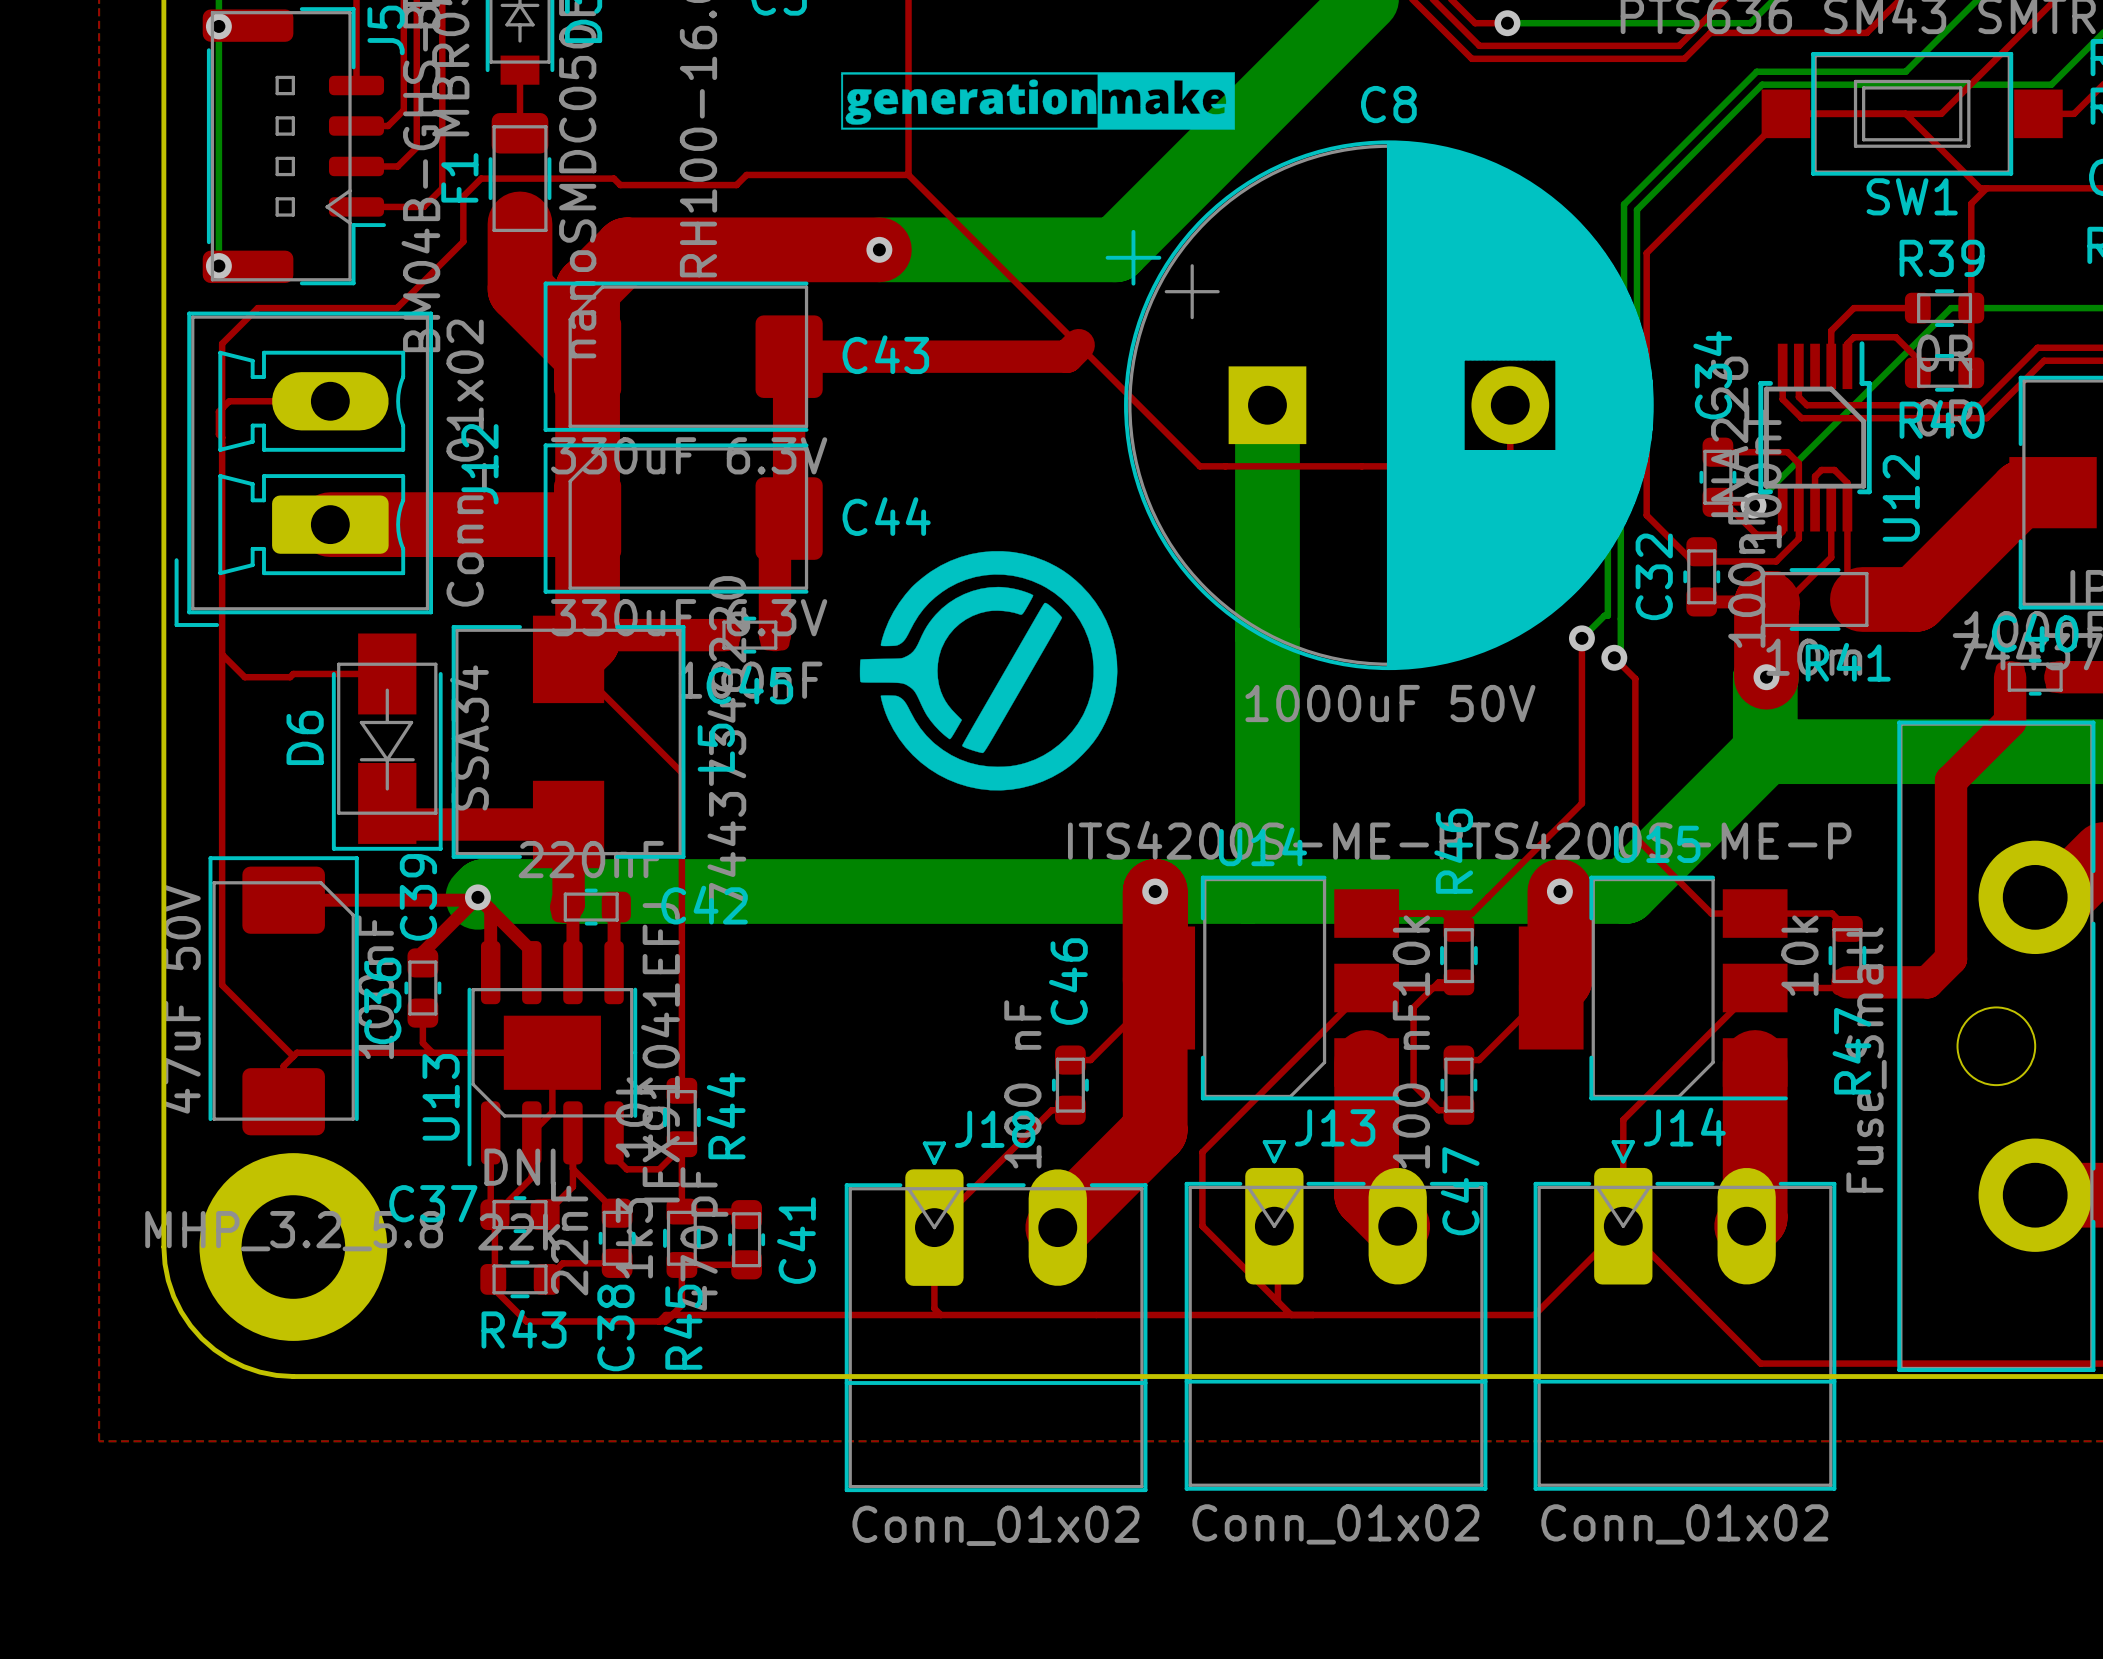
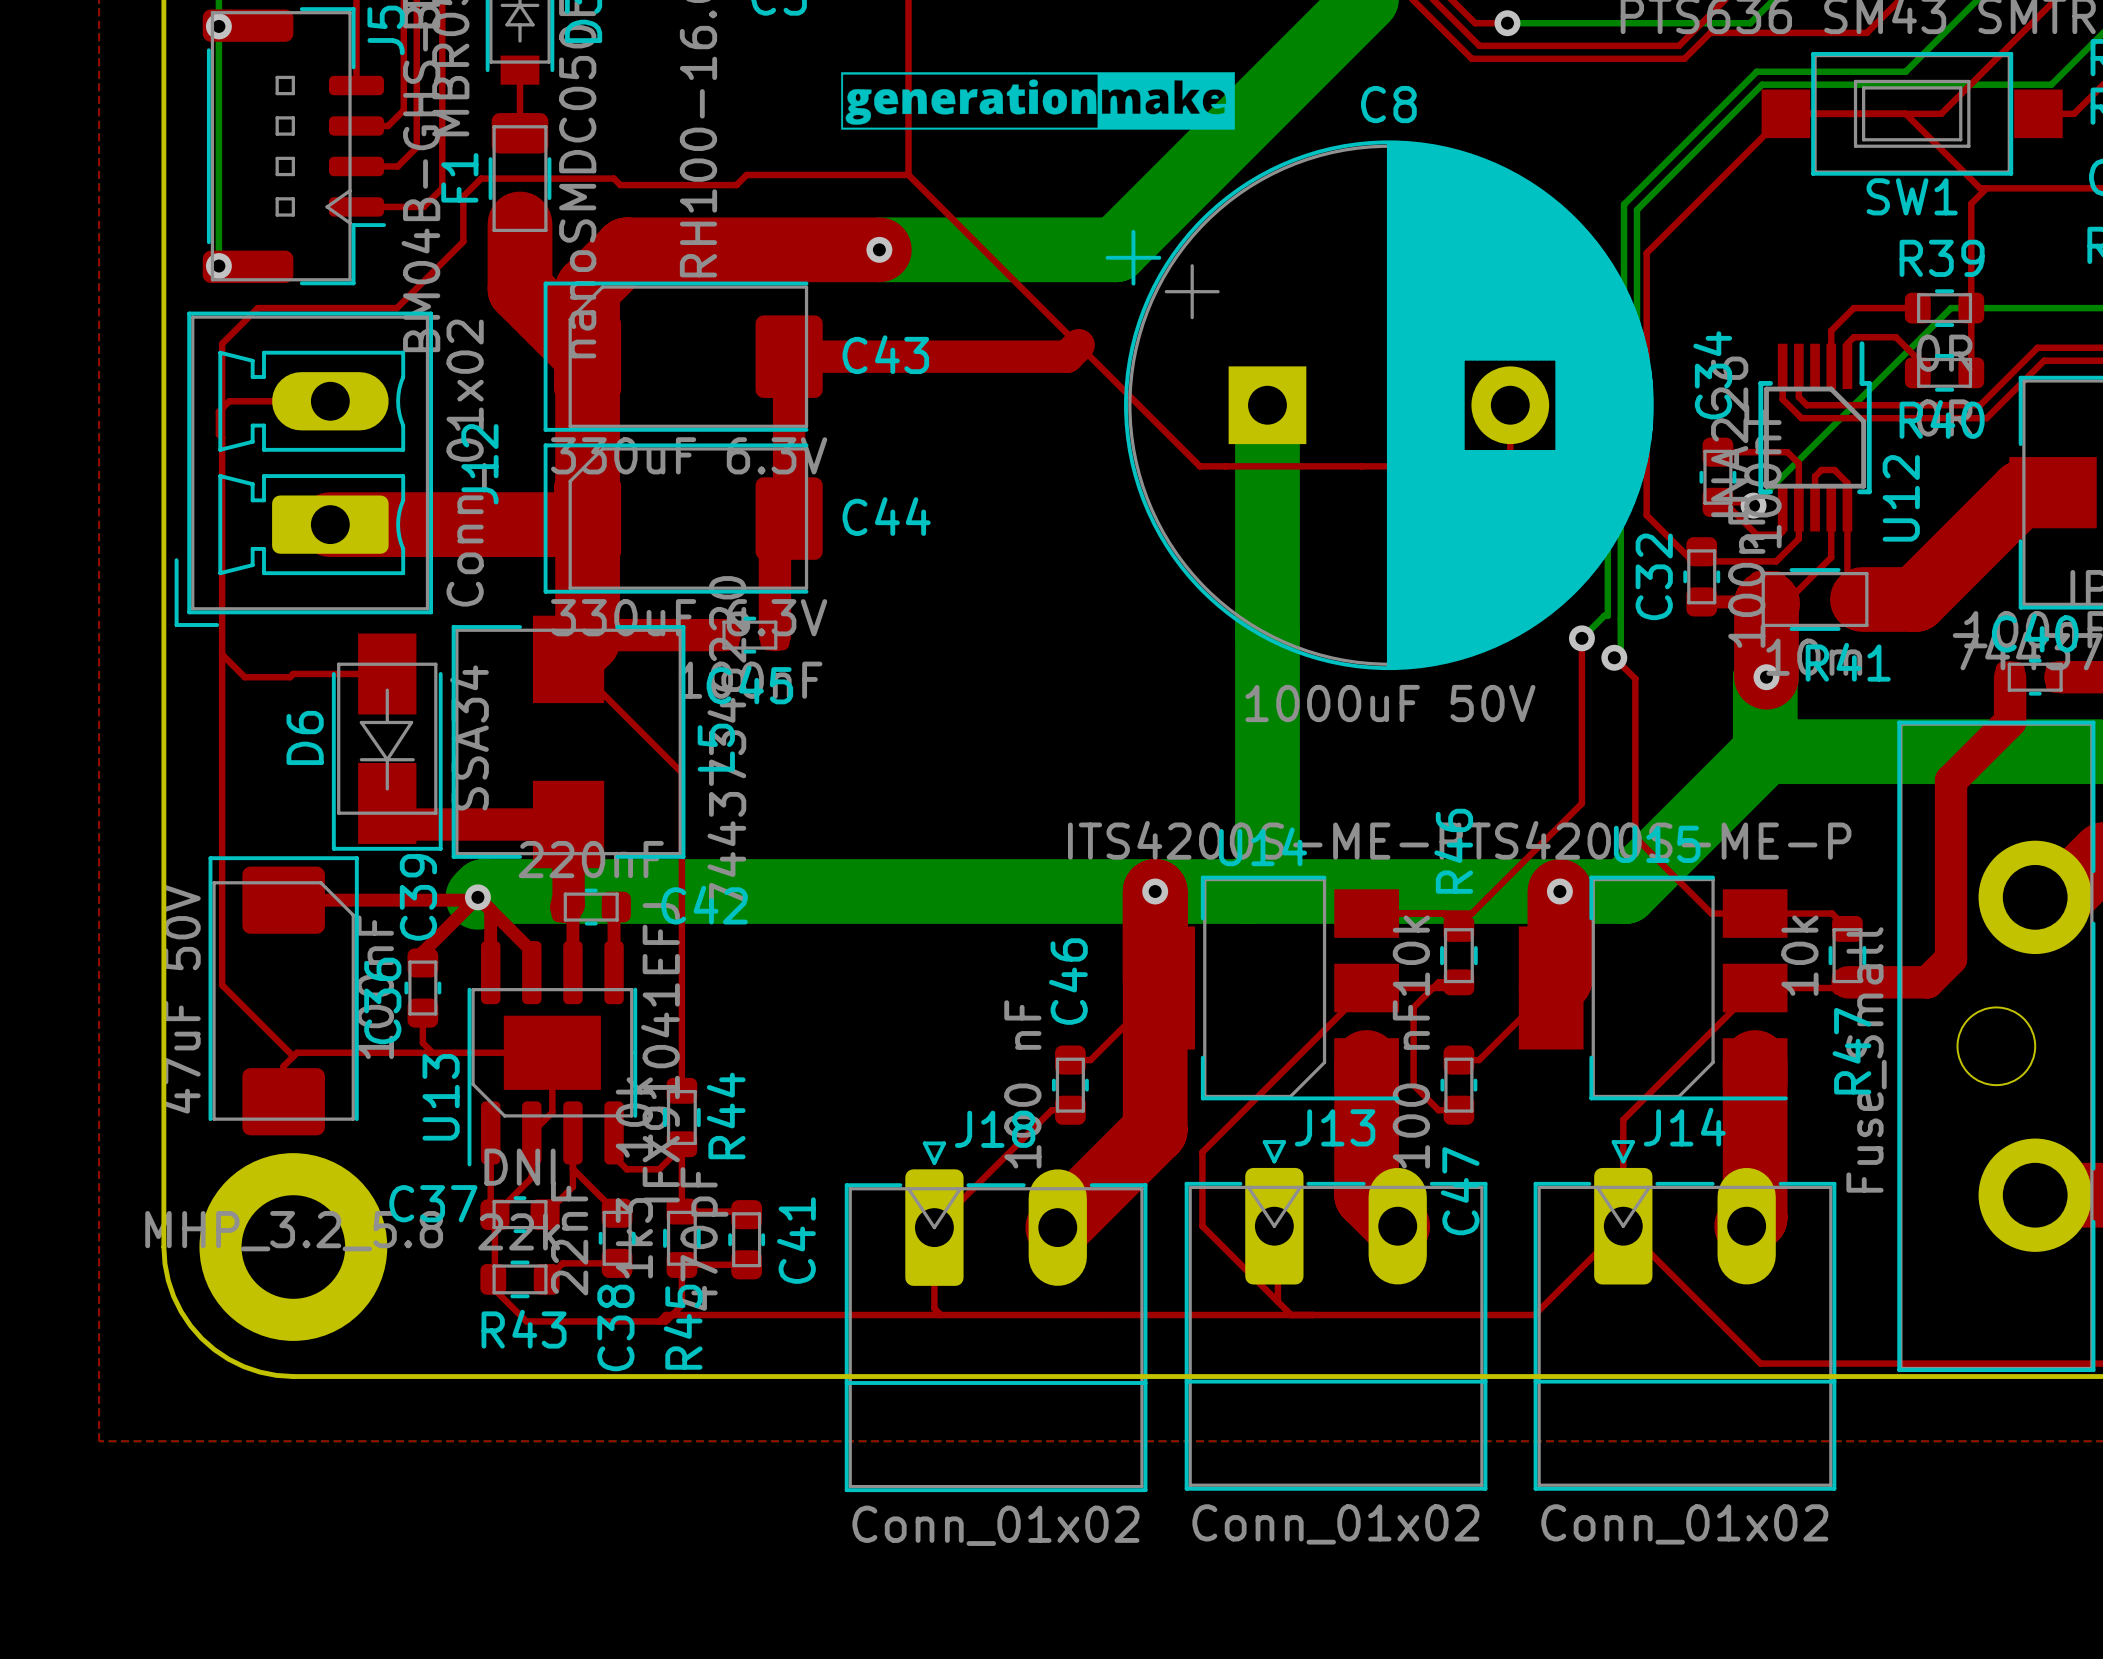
drawing: [859, 551, 1118, 791] -> none

